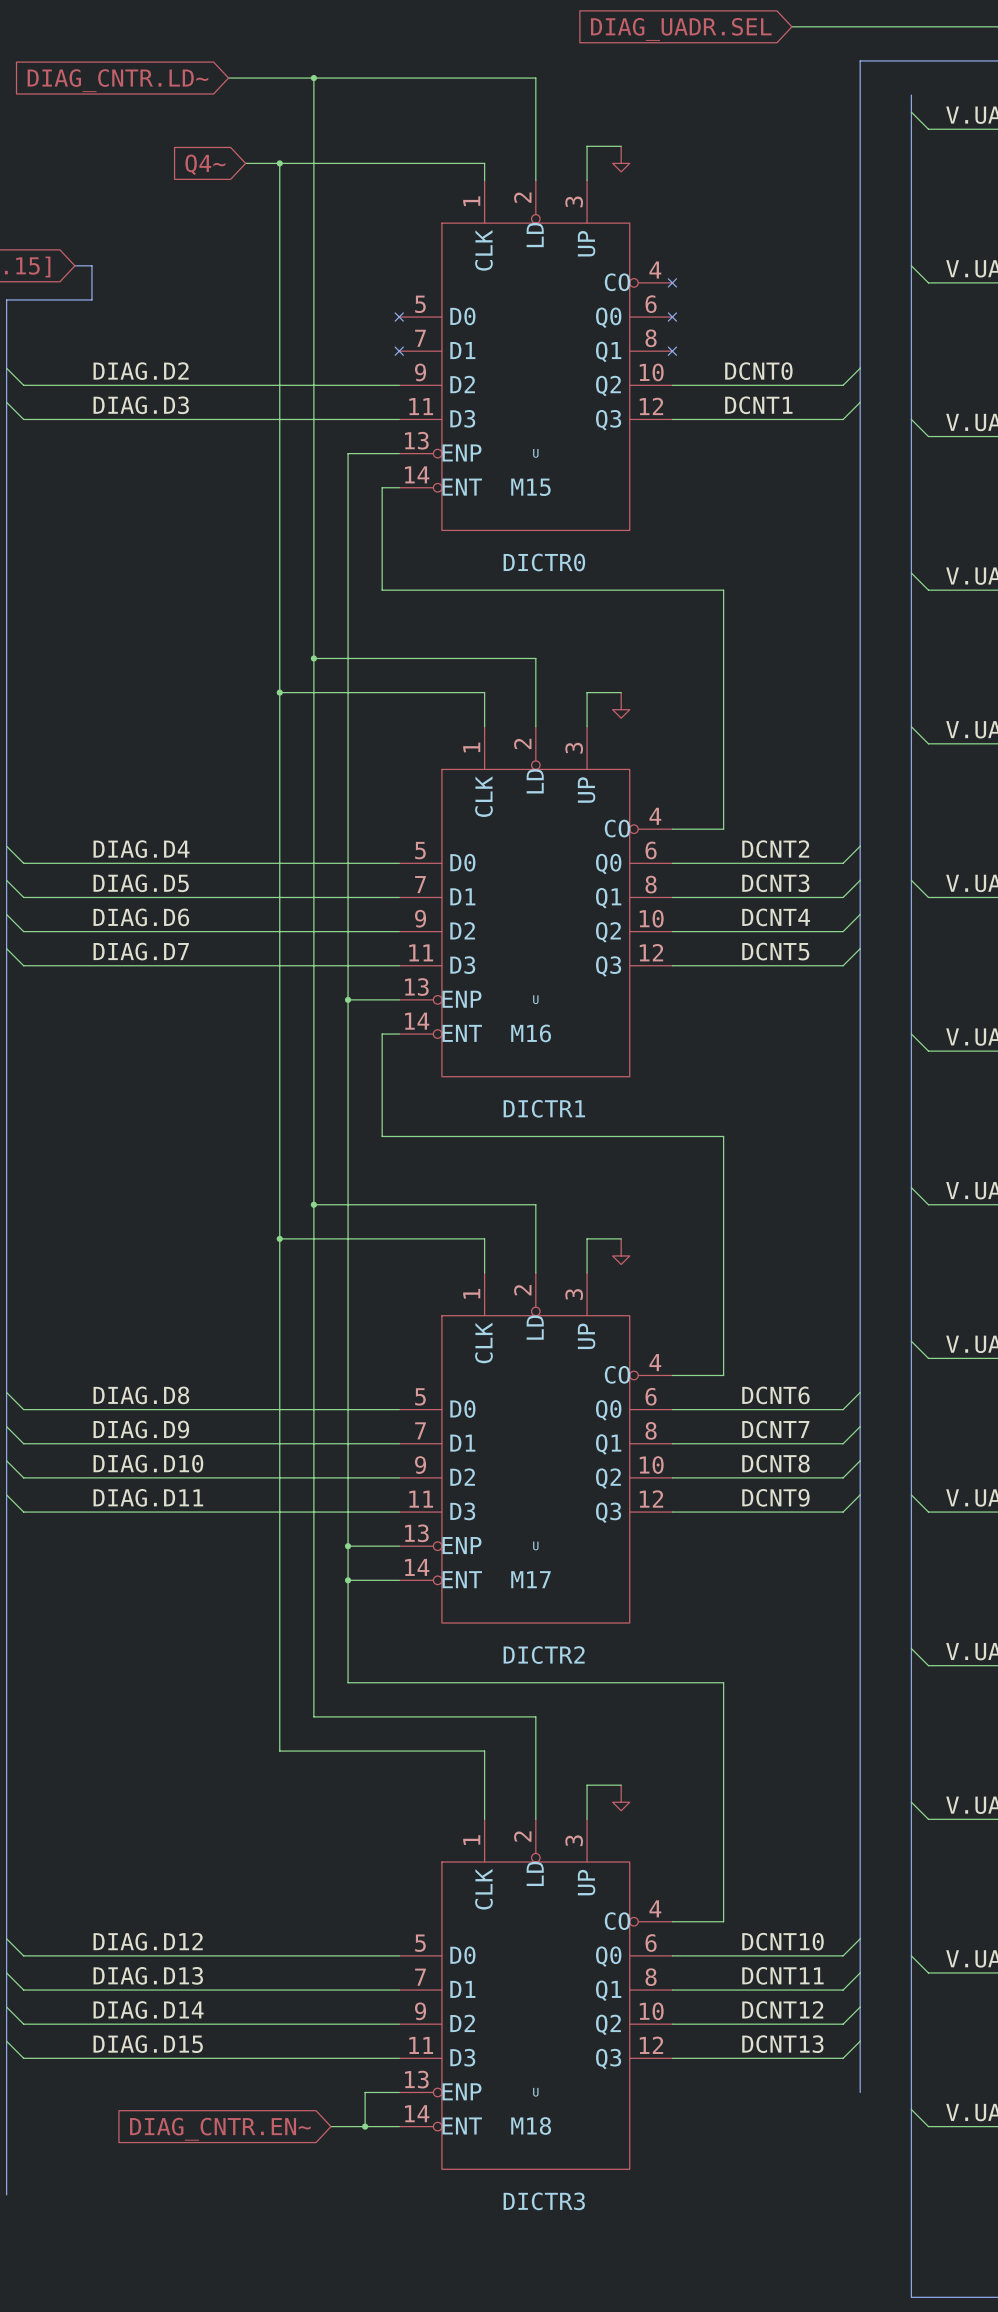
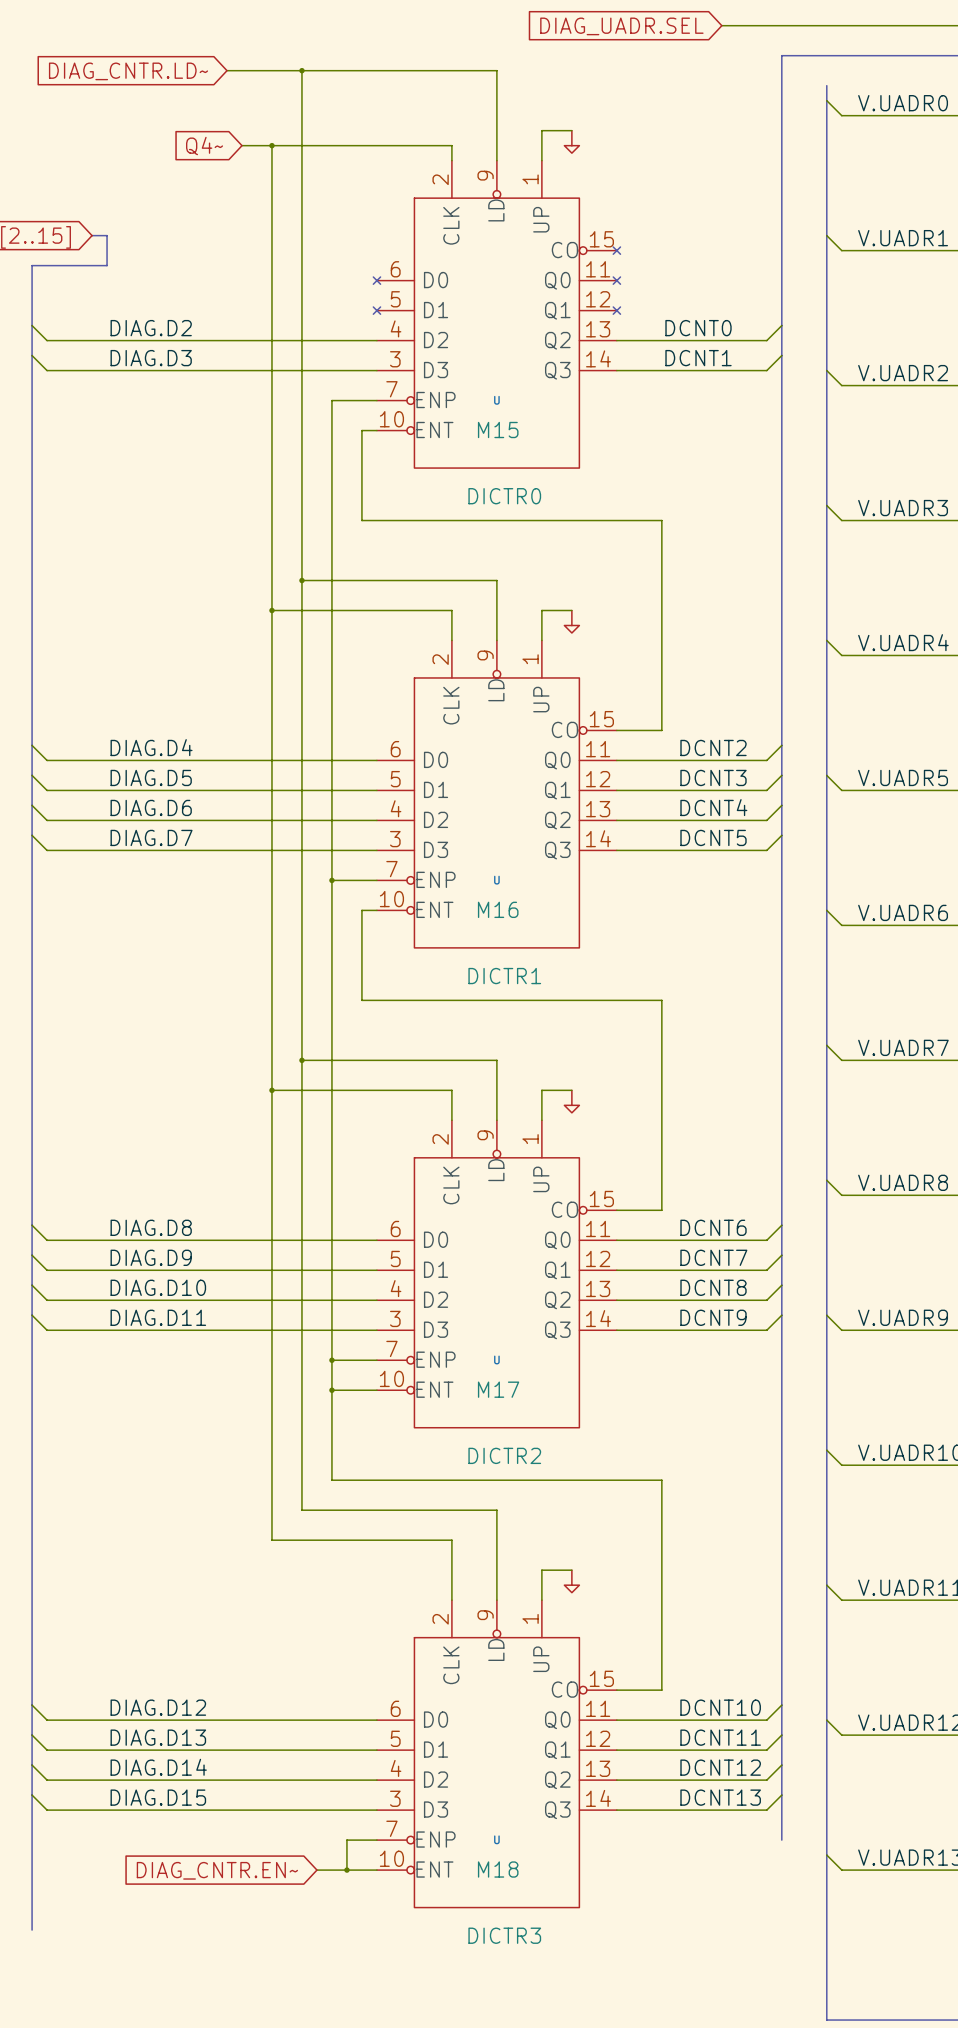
U symbol: [399, 180, 673, 531] -> [376, 160, 617, 469]
U symbol: [399, 726, 673, 1077] -> [376, 640, 617, 948]
U symbol: [399, 1273, 673, 1624] -> [376, 1120, 617, 1428]
U symbol: [399, 1819, 673, 2170] -> [376, 1600, 617, 1908]

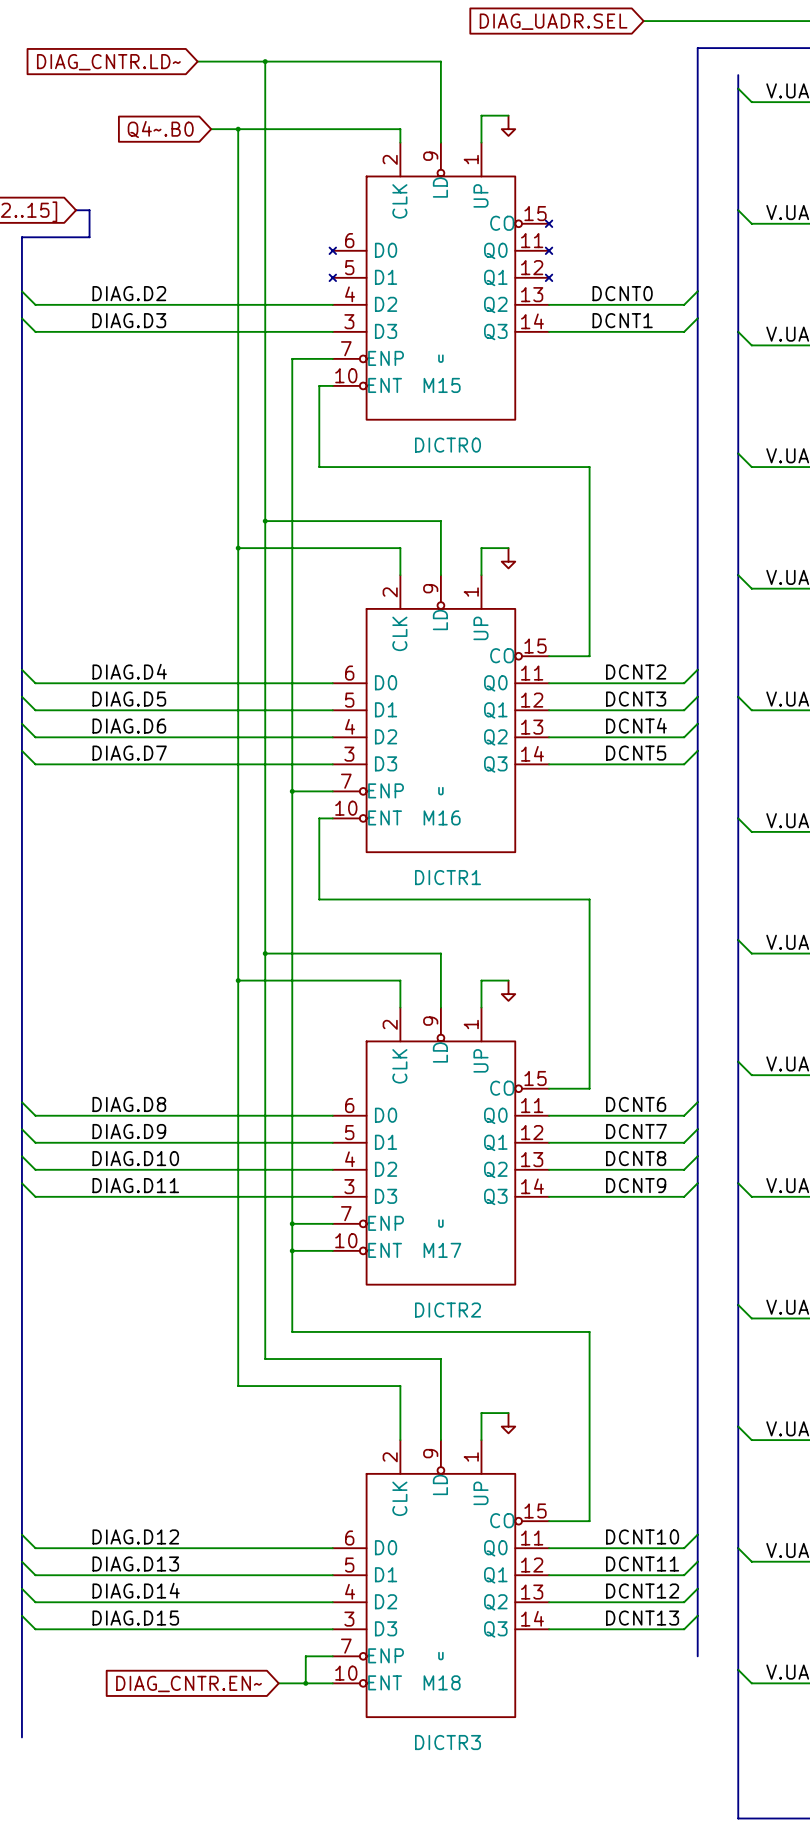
global label: Q4~ (204, 146) -> Q4~.B0 (160, 129)

